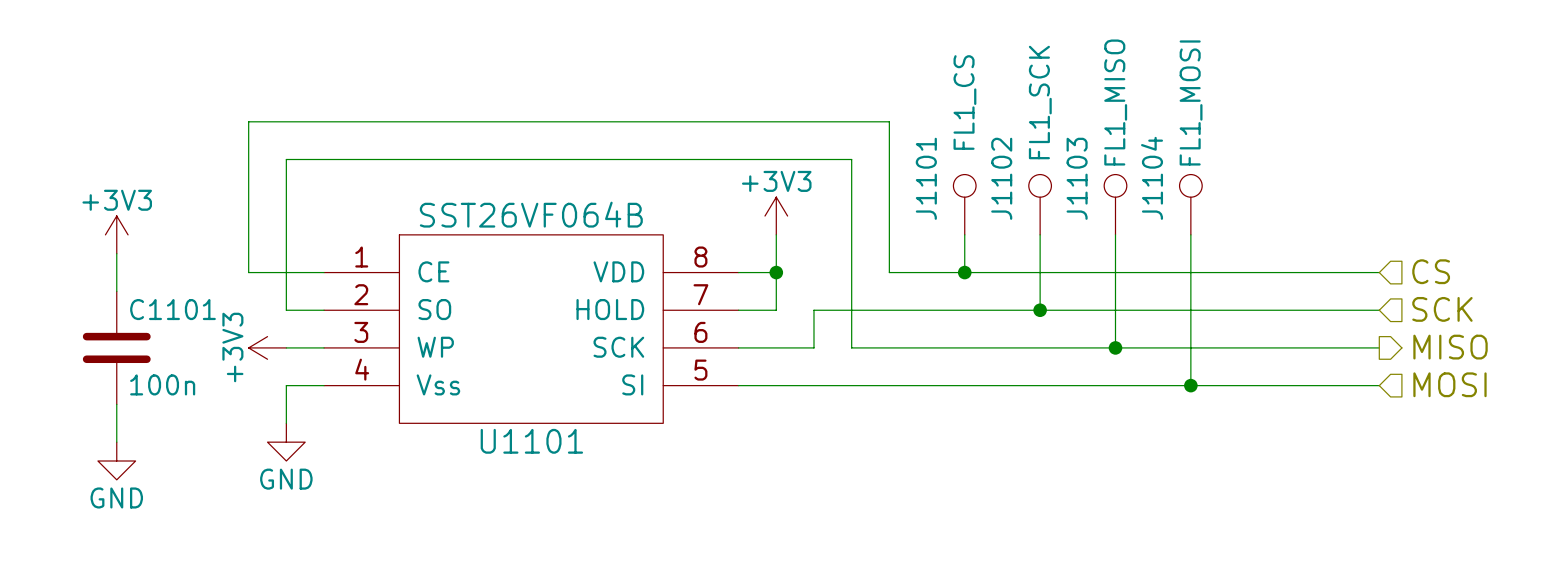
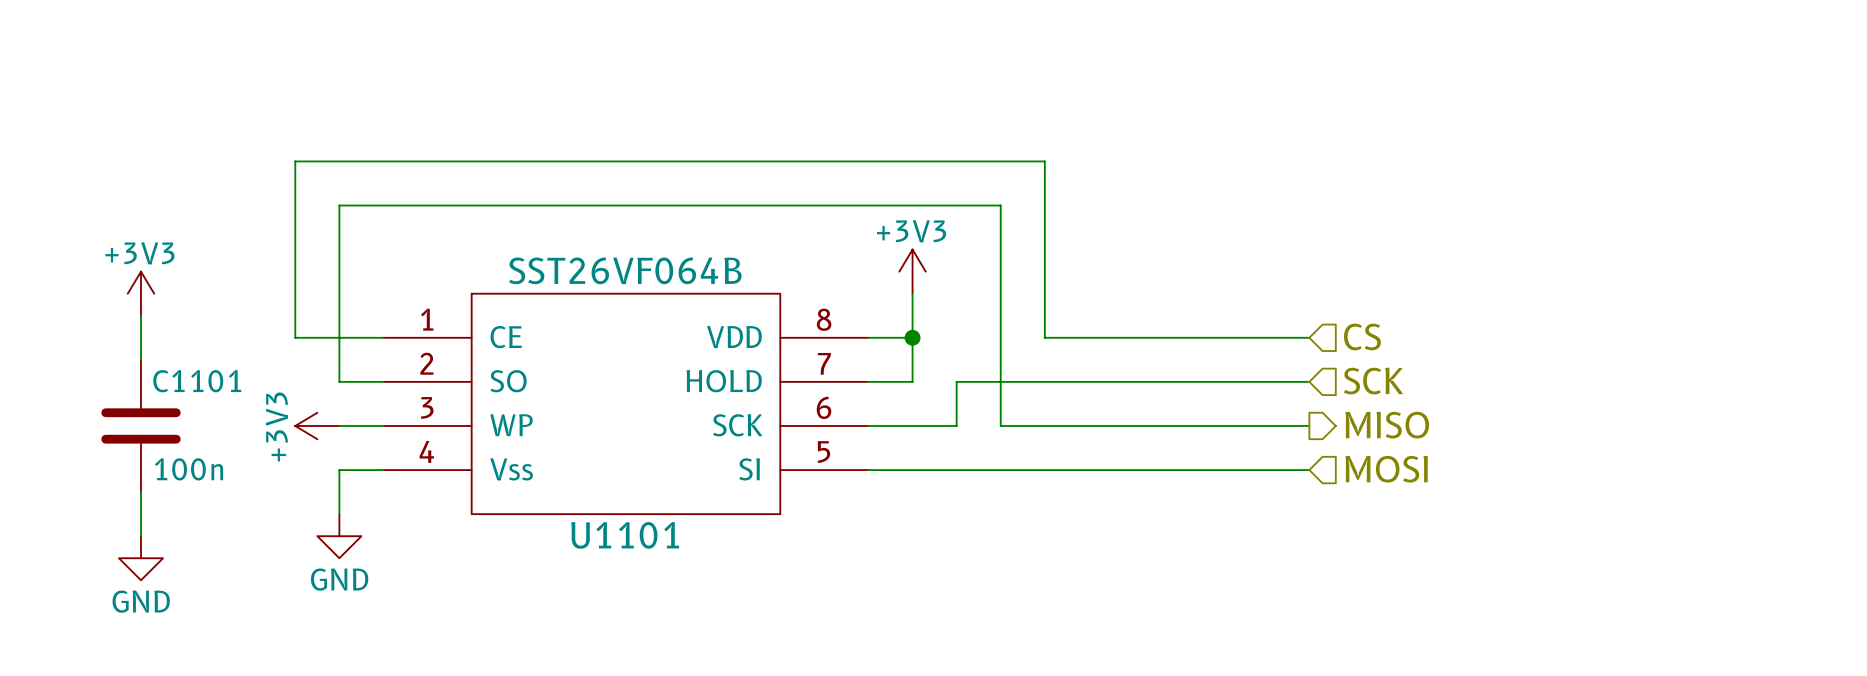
J1101: FL1_CS (964, 204) -> none
J1102: FL1_SCK (1040, 204) -> none
J1103: FL1_MISO (1115, 204) -> none
J1104: FL1_MOSI (1190, 204) -> none
wire: (964, 234) (964, 272) -> none
wire: (1040, 234) (1040, 310) -> none
wire: (1115, 234) (1115, 347) (1379, 347) -> none
wire: (1190, 234) (1190, 385) -> none
hierarchical label position: CS (1431, 271) -> CS (1362, 336)
junction: (964, 272) -> none
wire: (1115, 272) (1379, 272) -> none
hierarchical label position: SCK (1442, 309) -> SCK (1373, 381)
junction: (1040, 310) -> none
wire: (1115, 310) (1379, 310) -> none
junction: (1115, 347) -> none
hierarchical label position: MISO (1450, 347) -> MISO (1387, 425)
hierarchical label position: MOSI (1449, 384) -> MOSI (1386, 469)
wire: (1115, 385) (1379, 385) -> none
junction: (1190, 385) -> none

